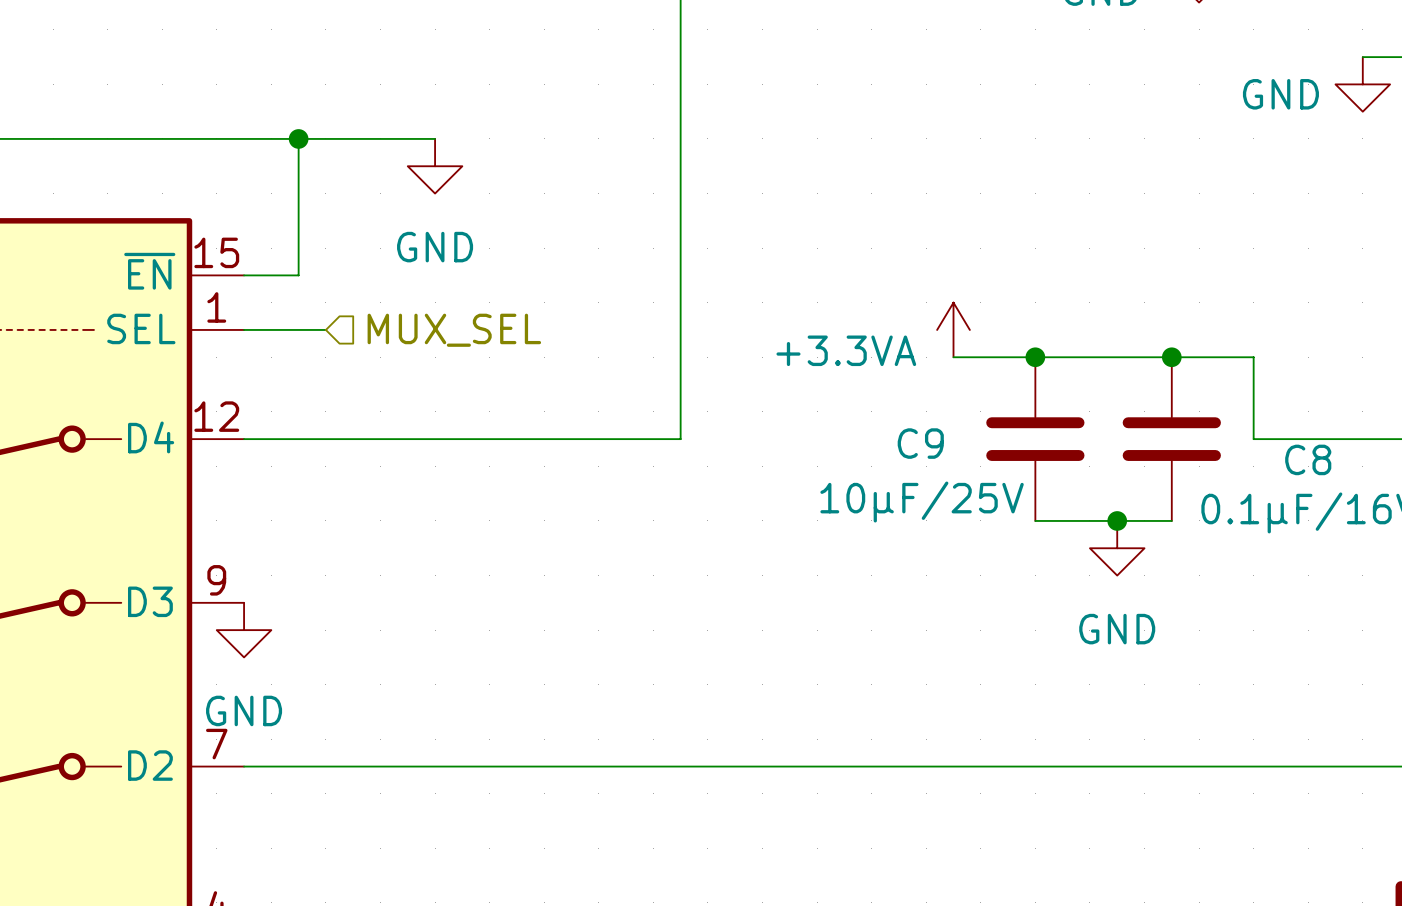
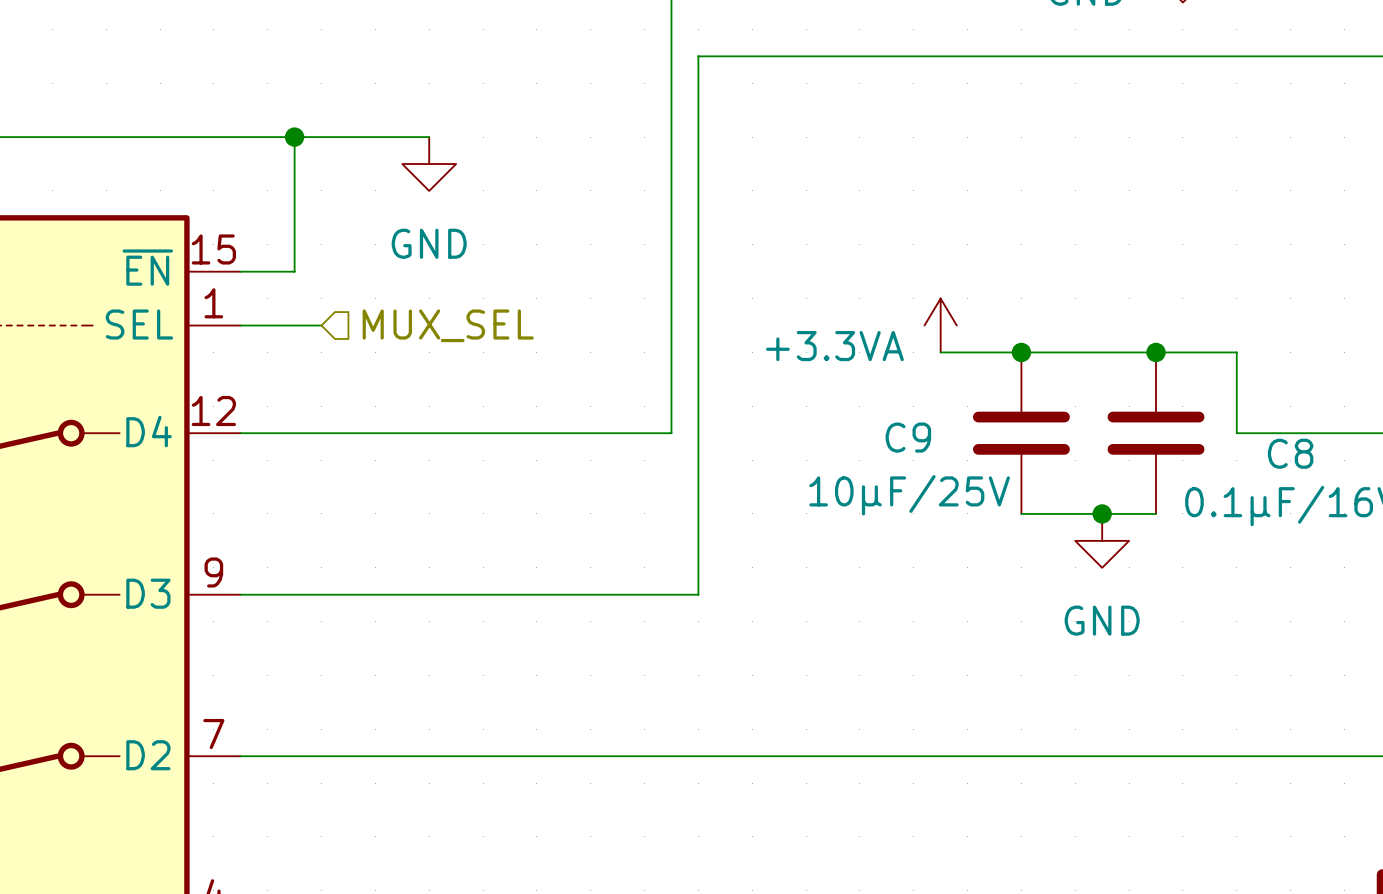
wire: none -> (1344, 56) (698, 56) (698, 594) (240, 594)
power symbol: GND (1362, 84) -> none
power symbol: GND (244, 630) -> none

